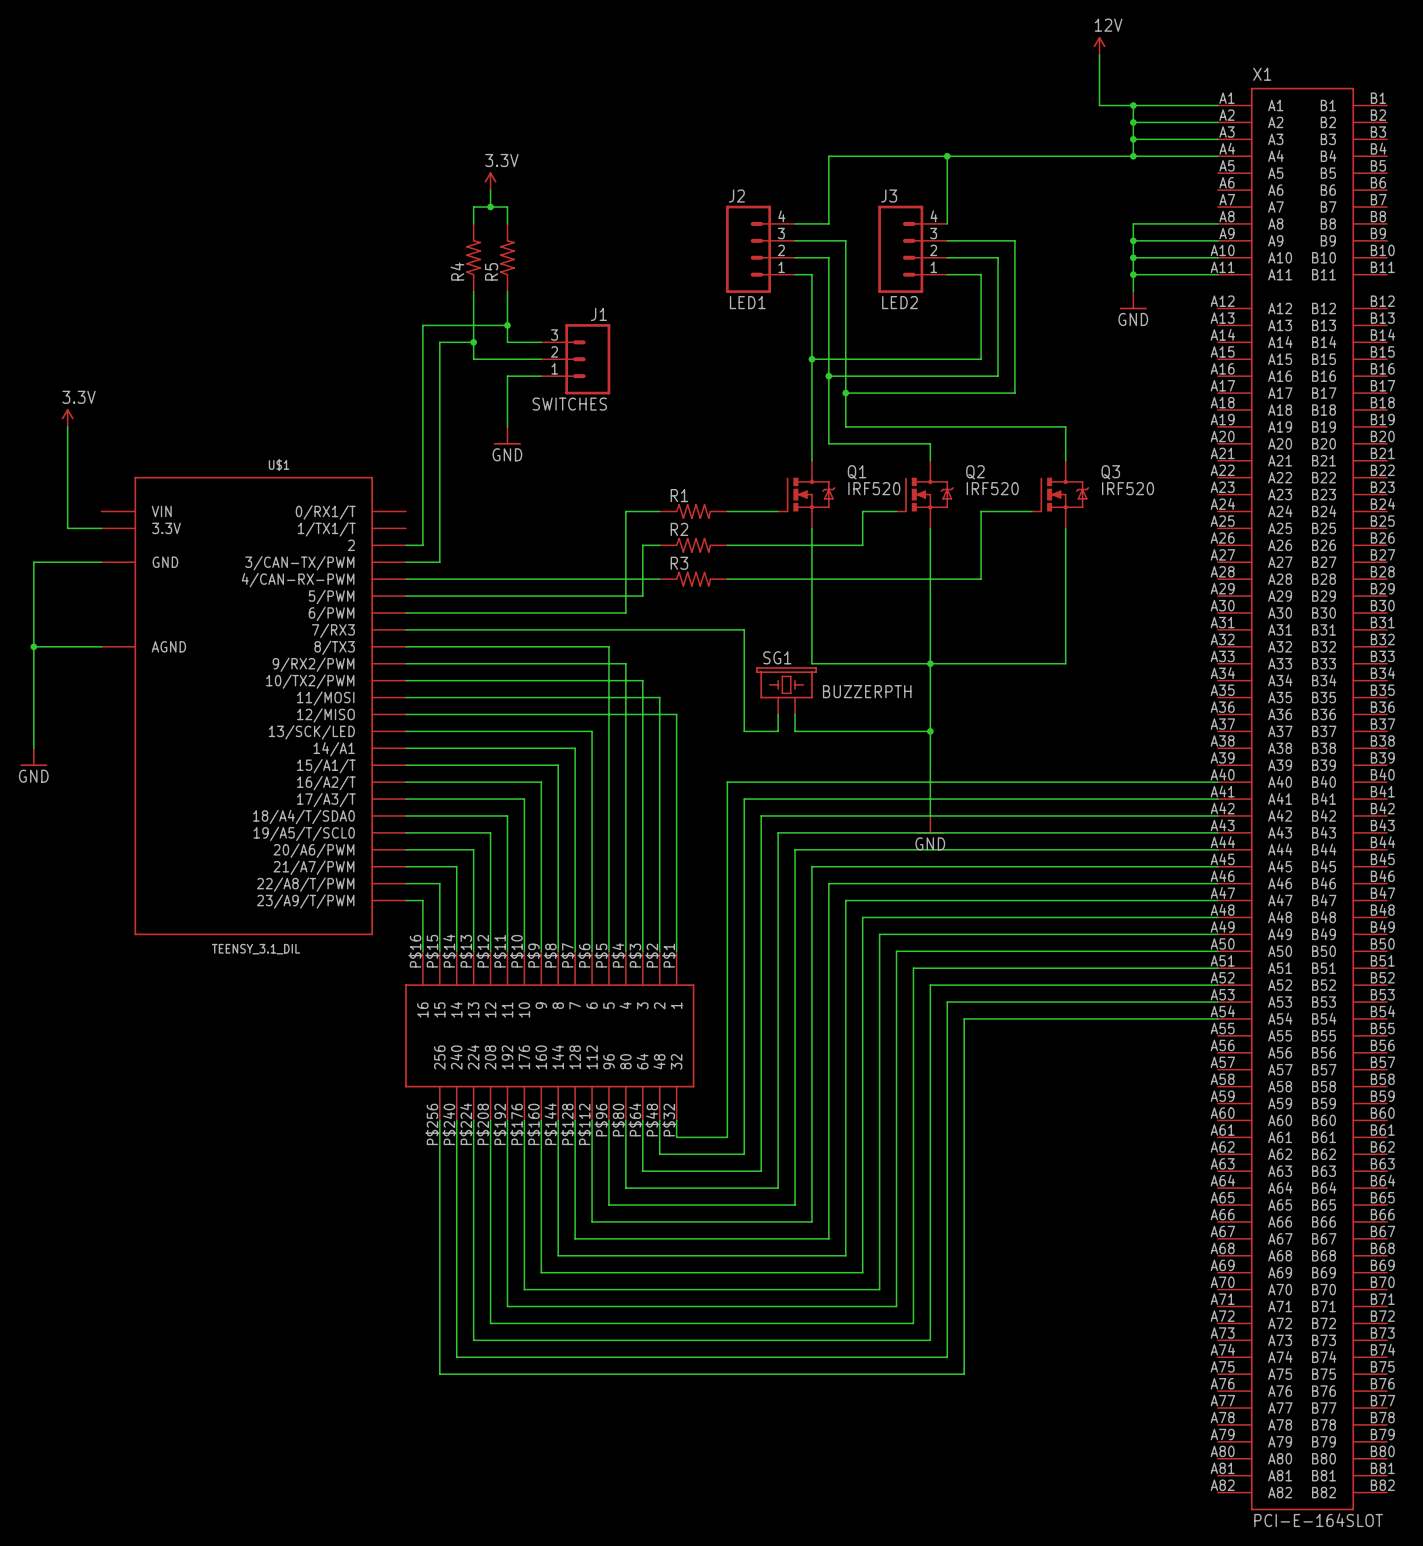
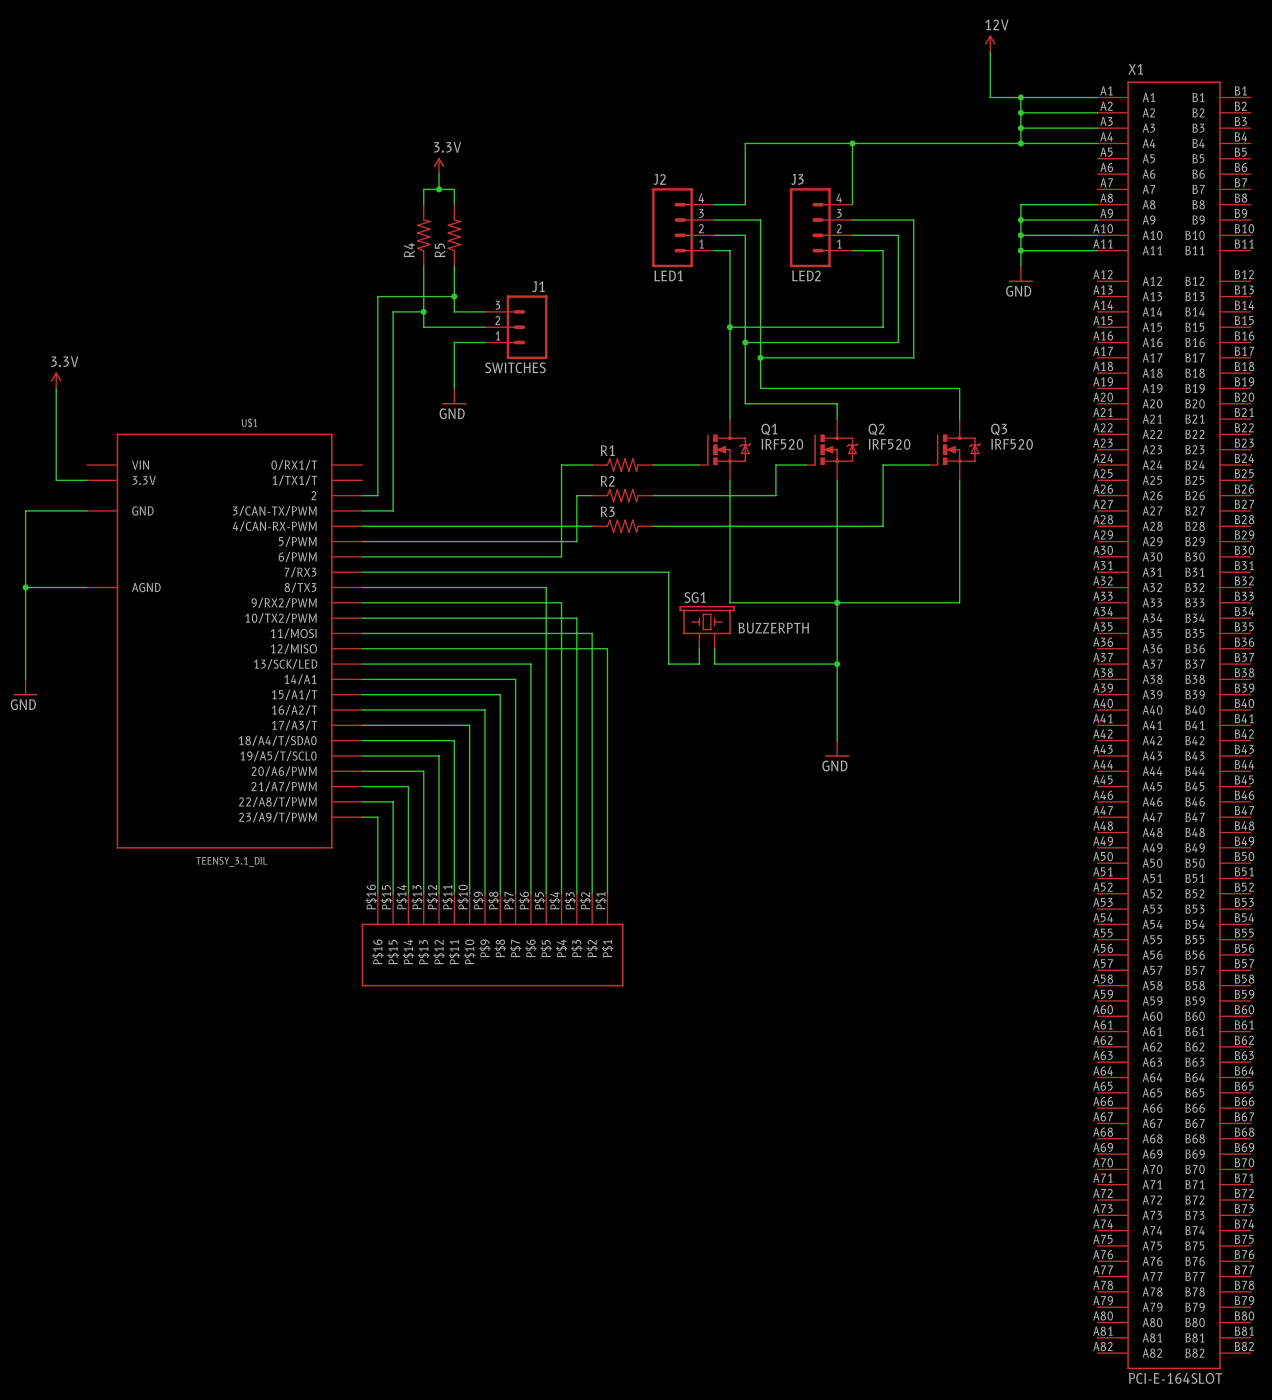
wire: (1217, 782) (727, 782) (727, 1137) (676, 1137) (676, 1120) -> none
wire: (1217, 799) (744, 799) (744, 1154) (659, 1154) (659, 1120) -> none
wire: (1217, 815) (761, 815) (761, 1171) (642, 1171) (642, 1120) -> none
wire: (1217, 832) (778, 832) (778, 1188) (625, 1188) (625, 1120) -> none
wire: (1217, 849) (795, 849) (795, 1205) (608, 1205) (608, 1120) -> none
wire: (1217, 866) (811, 866) (811, 1221) (592, 1221) (592, 1120) -> none
wire: (1217, 883) (828, 883) (828, 1238) (575, 1238) (575, 1120) -> none
wire: (1217, 900) (845, 900) (845, 1255) (558, 1255) (558, 1120) -> none
wire: (1217, 917) (862, 917) (862, 1272) (541, 1272) (541, 1120) -> none
wire: (1217, 934) (879, 934) (879, 1289) (524, 1289) (524, 1120) -> none
part symbol: [405, 951, 695, 1121] -> [361, 893, 624, 987]
wire: (1217, 951) (896, 951) (896, 1306) (507, 1306) (507, 1120) -> none
wire: (1217, 968) (913, 968) (913, 1323) (490, 1323) (490, 1120) -> none
wire: (1217, 985) (930, 985) (930, 1340) (473, 1340) (473, 1120) -> none
wire: (1217, 1002) (947, 1002) (947, 1357) (456, 1357) (456, 1120) -> none
wire: (1217, 1018) (964, 1018) (964, 1374) (439, 1374) (439, 1120) -> none

